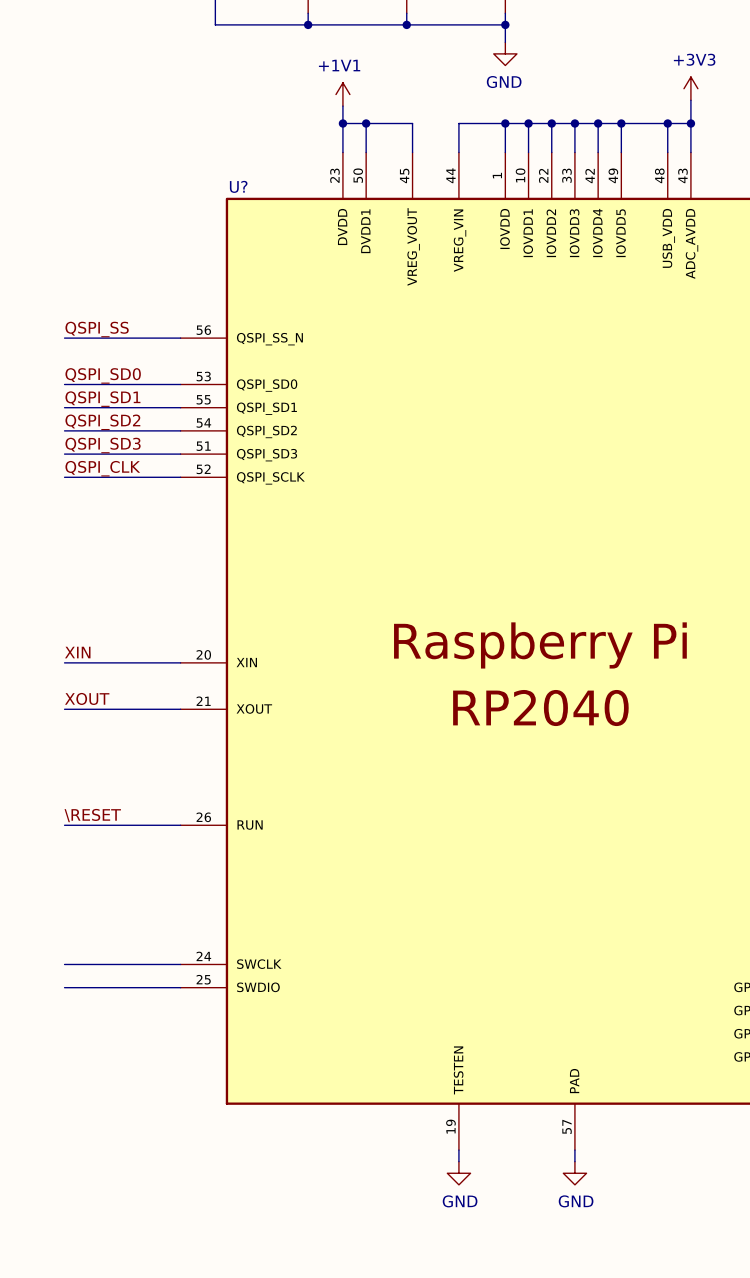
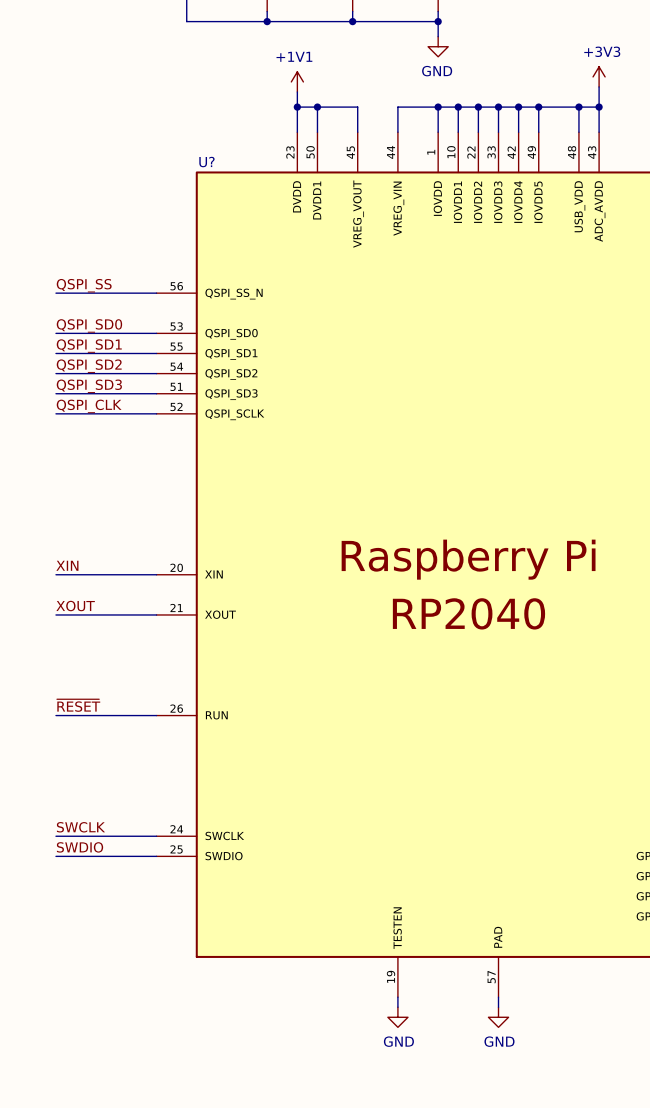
label: \RESET (92, 815) -> ~{RESET} (78, 705)
label: none -> SWCLK (80, 827)
label: none -> SWDIO (80, 847)

